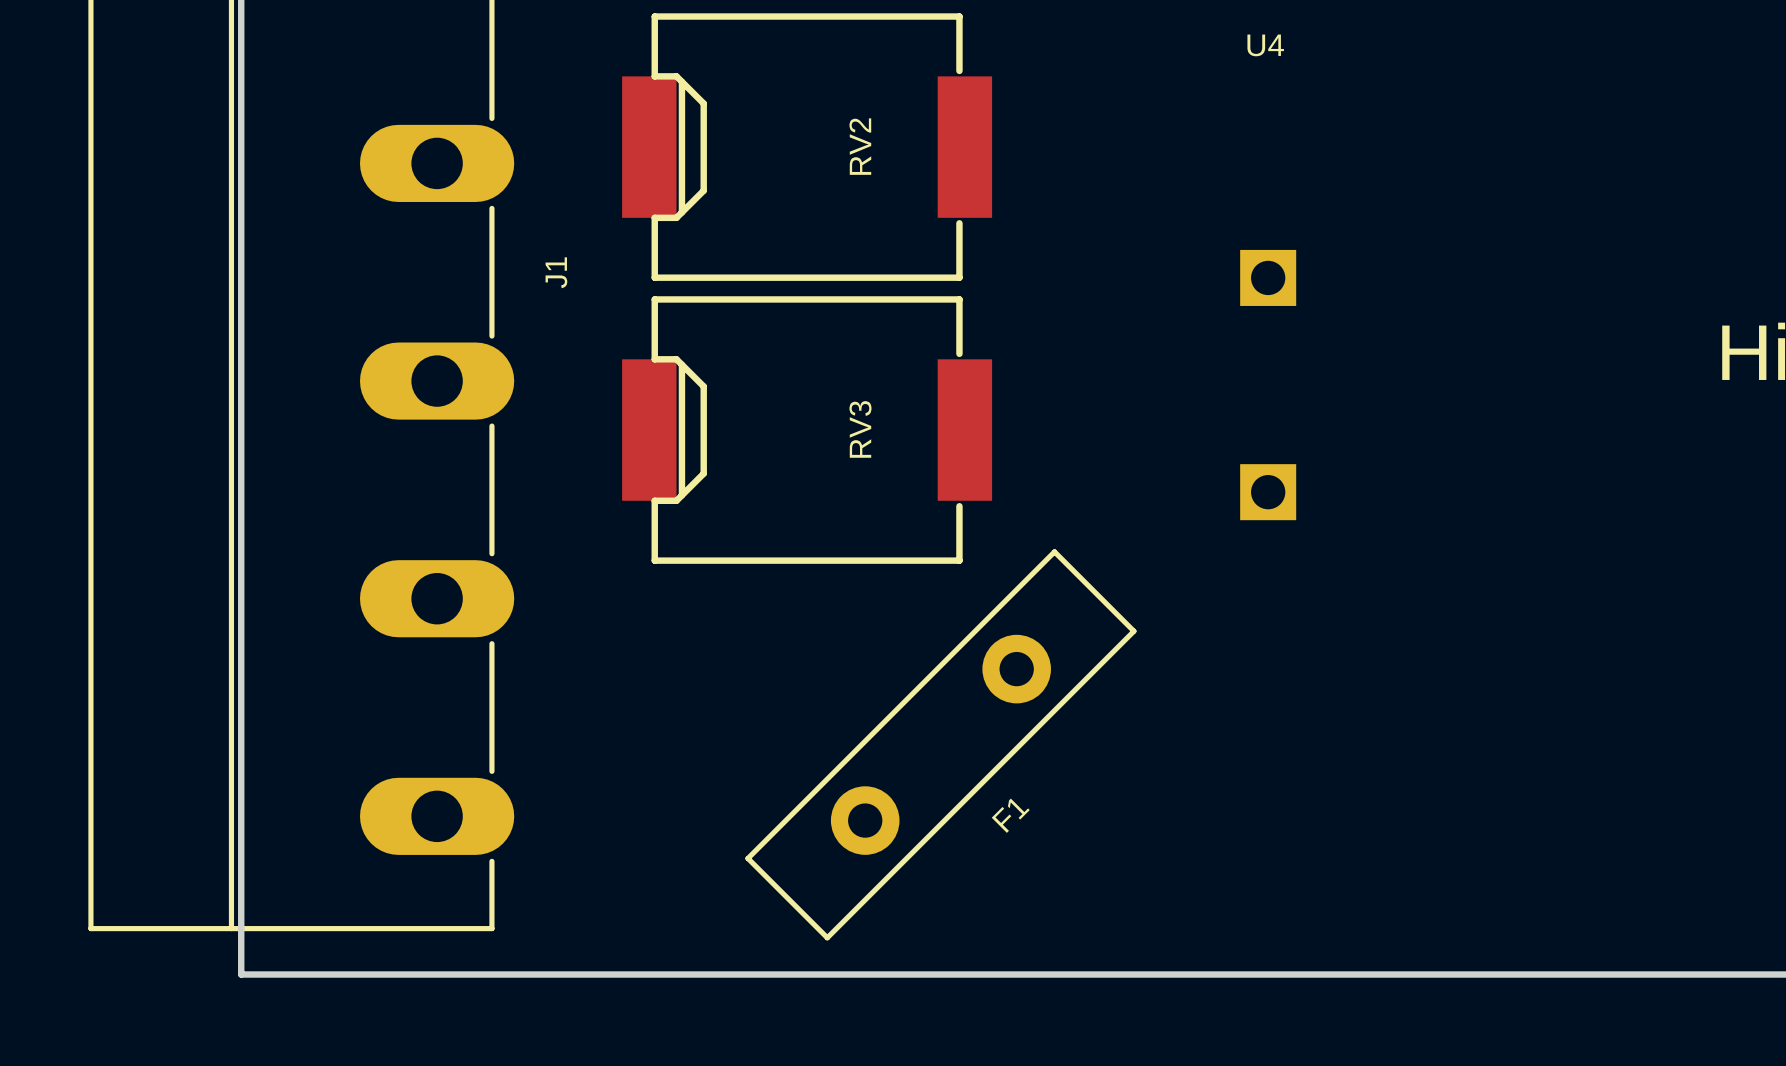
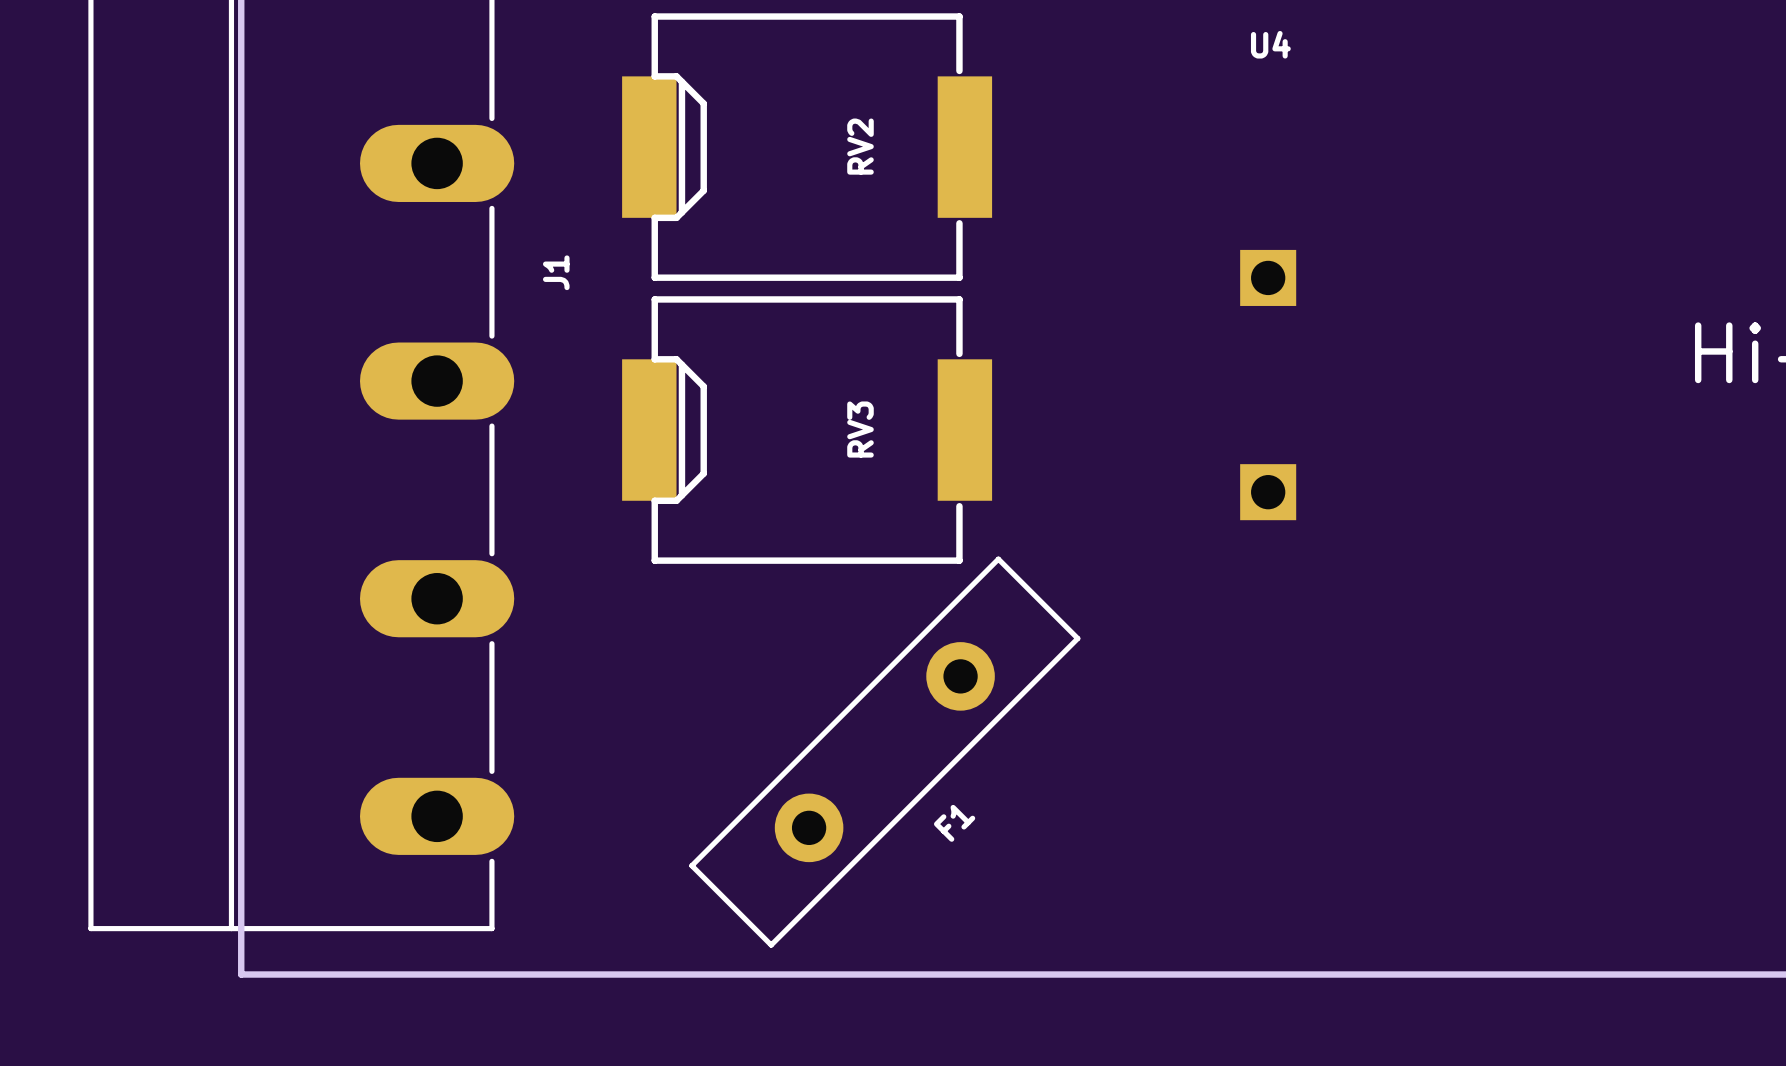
F1 position: (940, 744) -> (884, 752)

